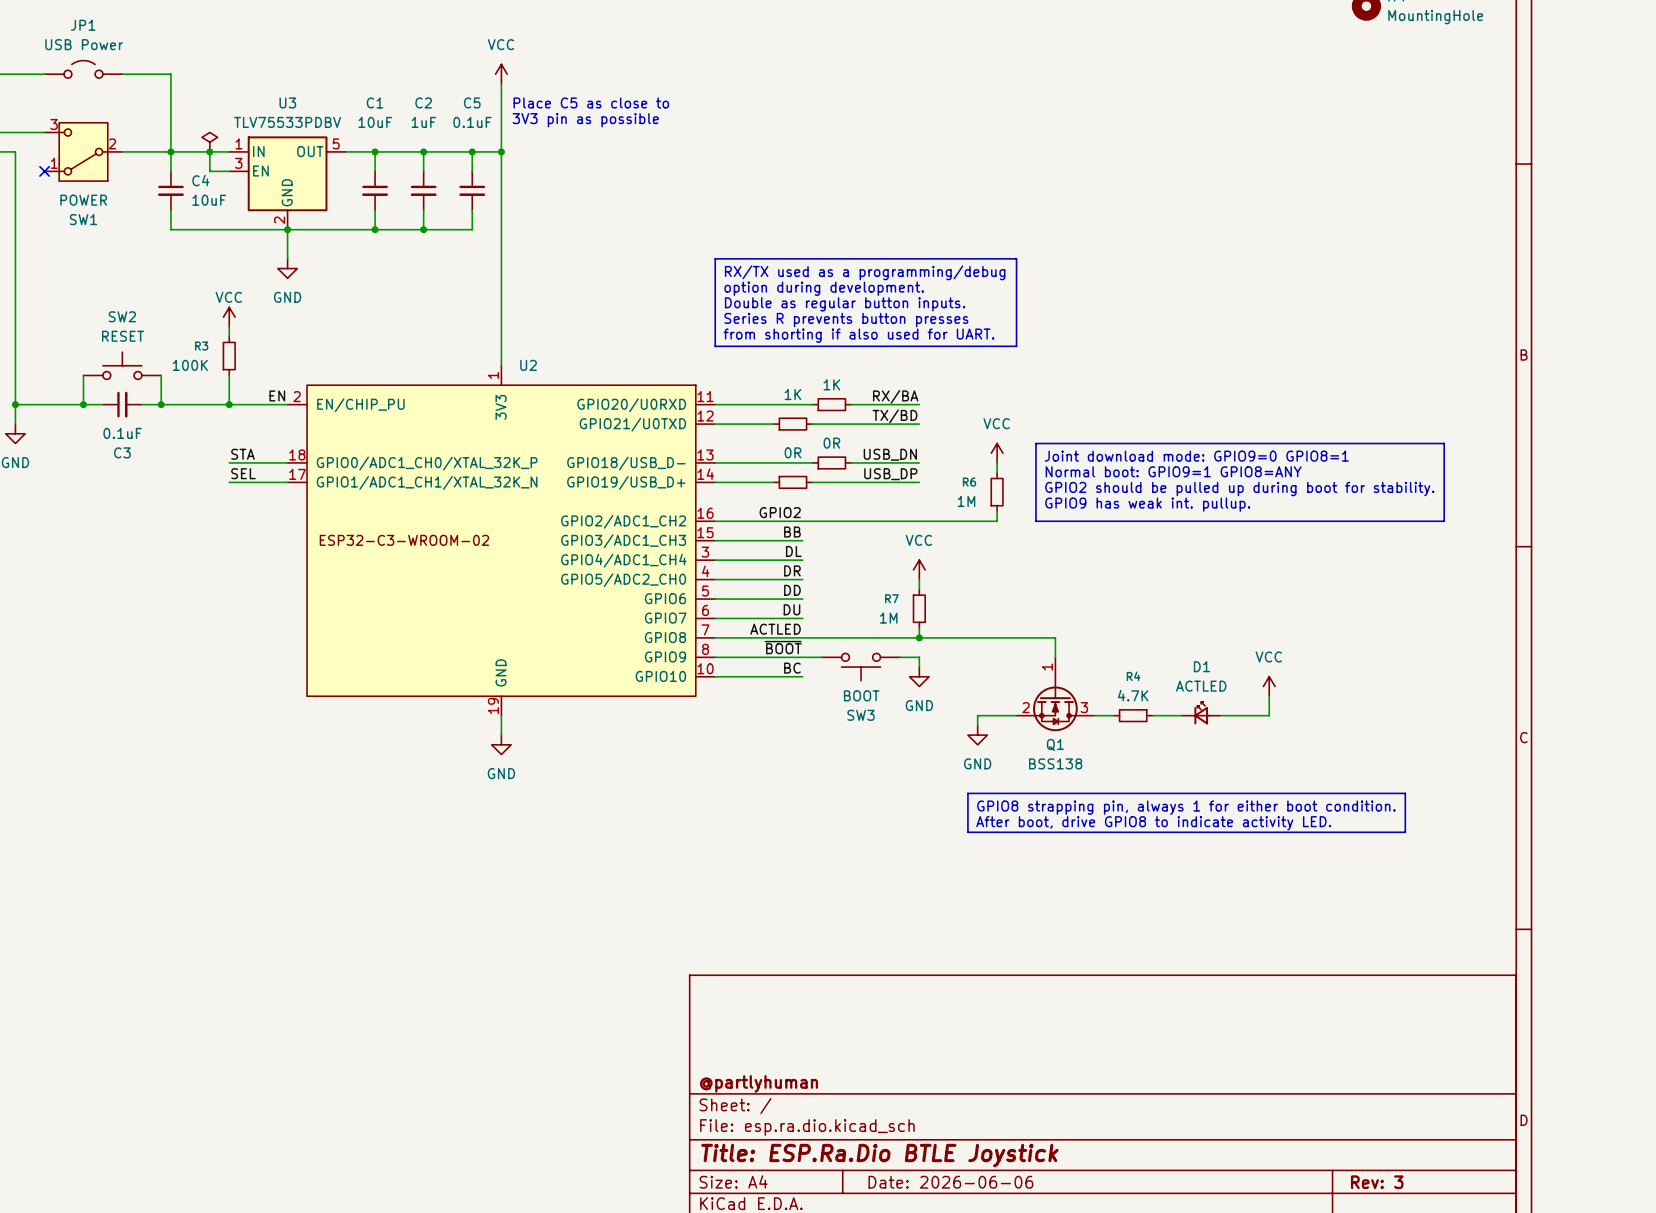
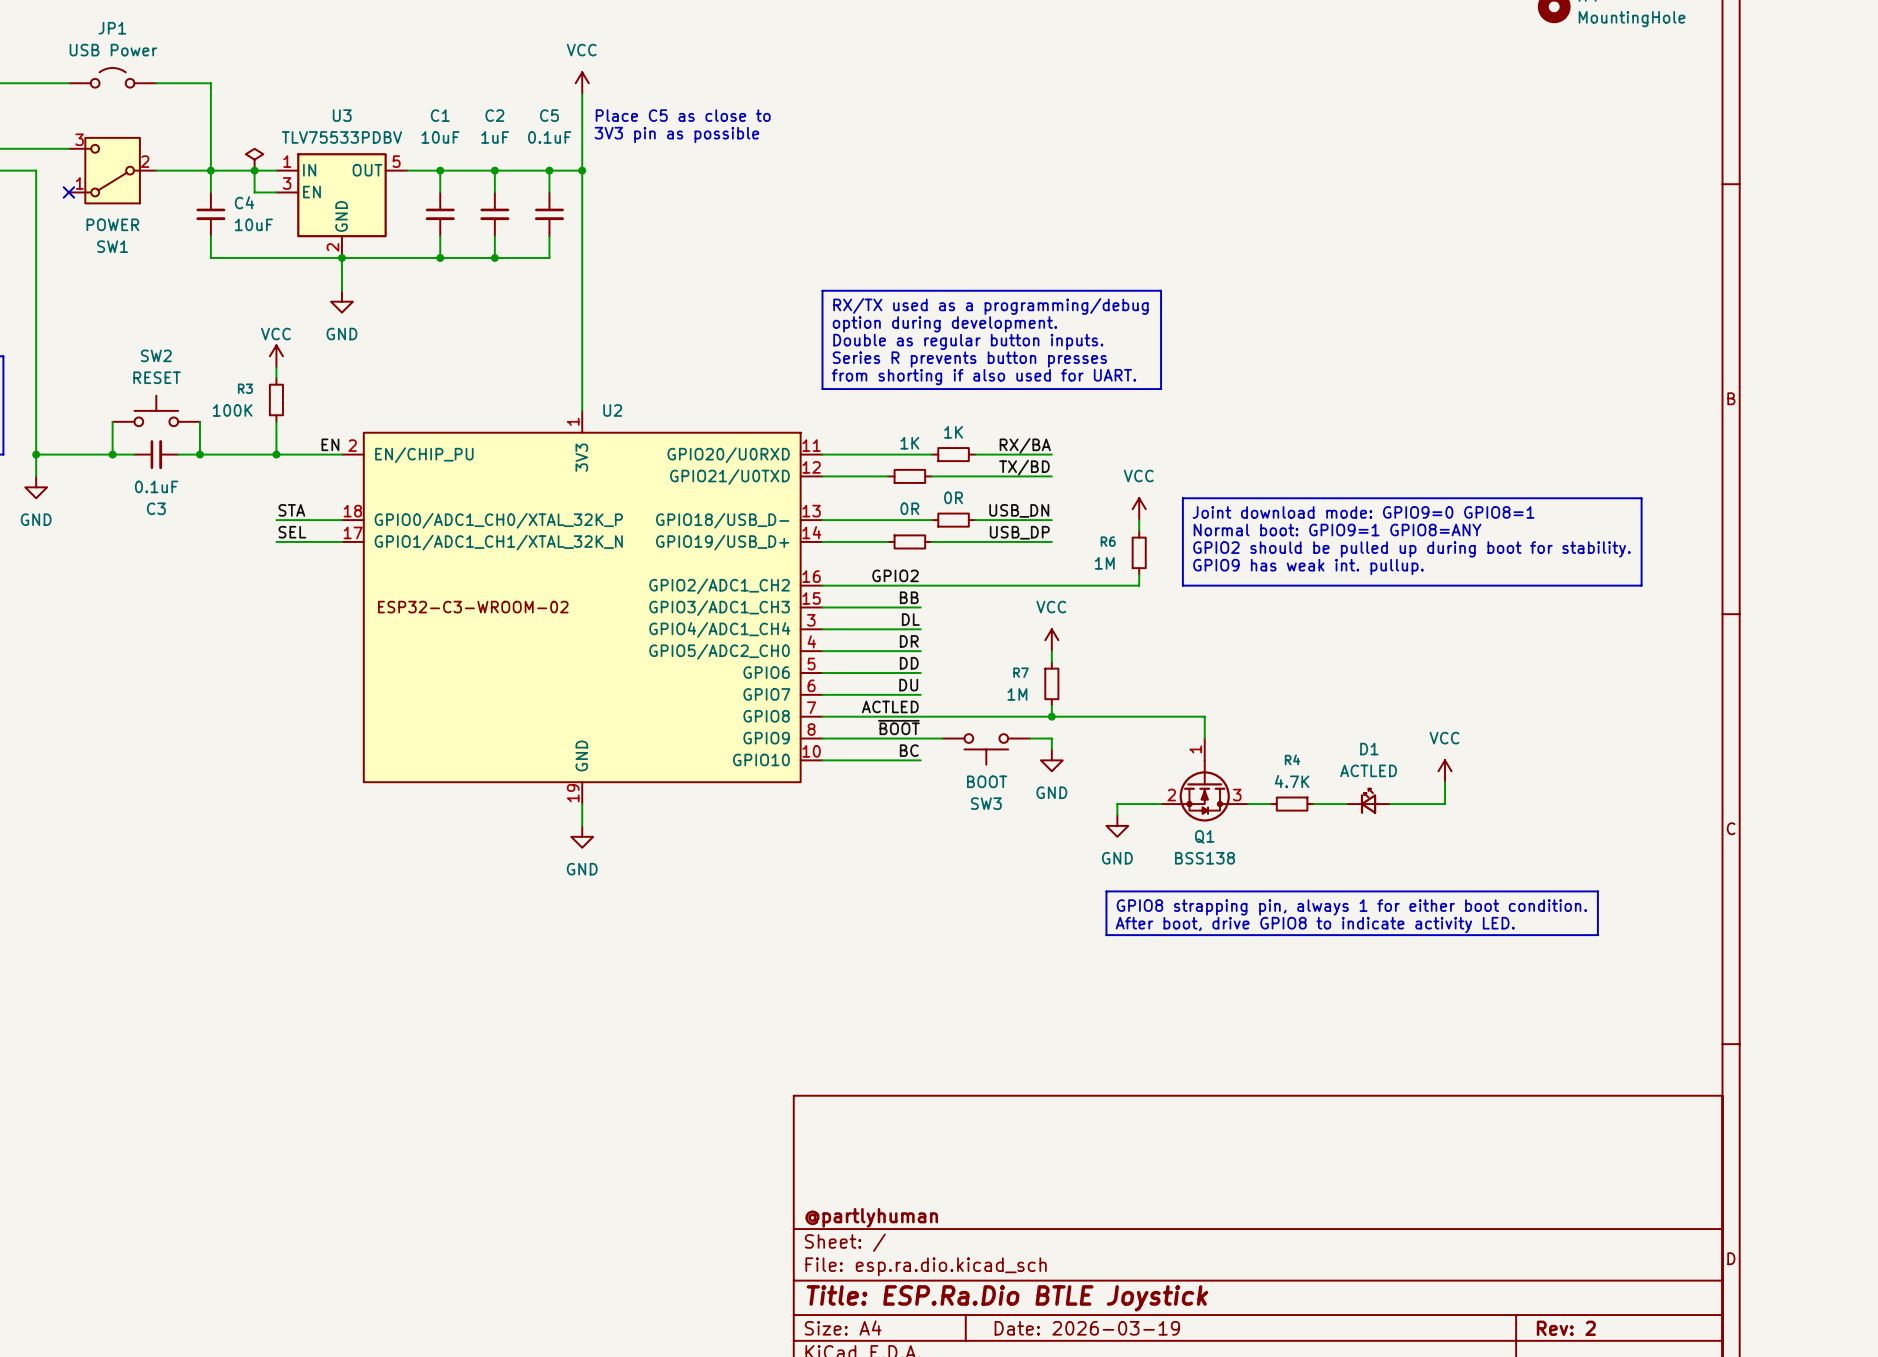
title block: Date: 2026-06-06 (950, 1182) -> Date: 2026-03-19 (1087, 1328)
title block: Rev: 3 (1377, 1182) -> Rev: 2 (1566, 1328)

